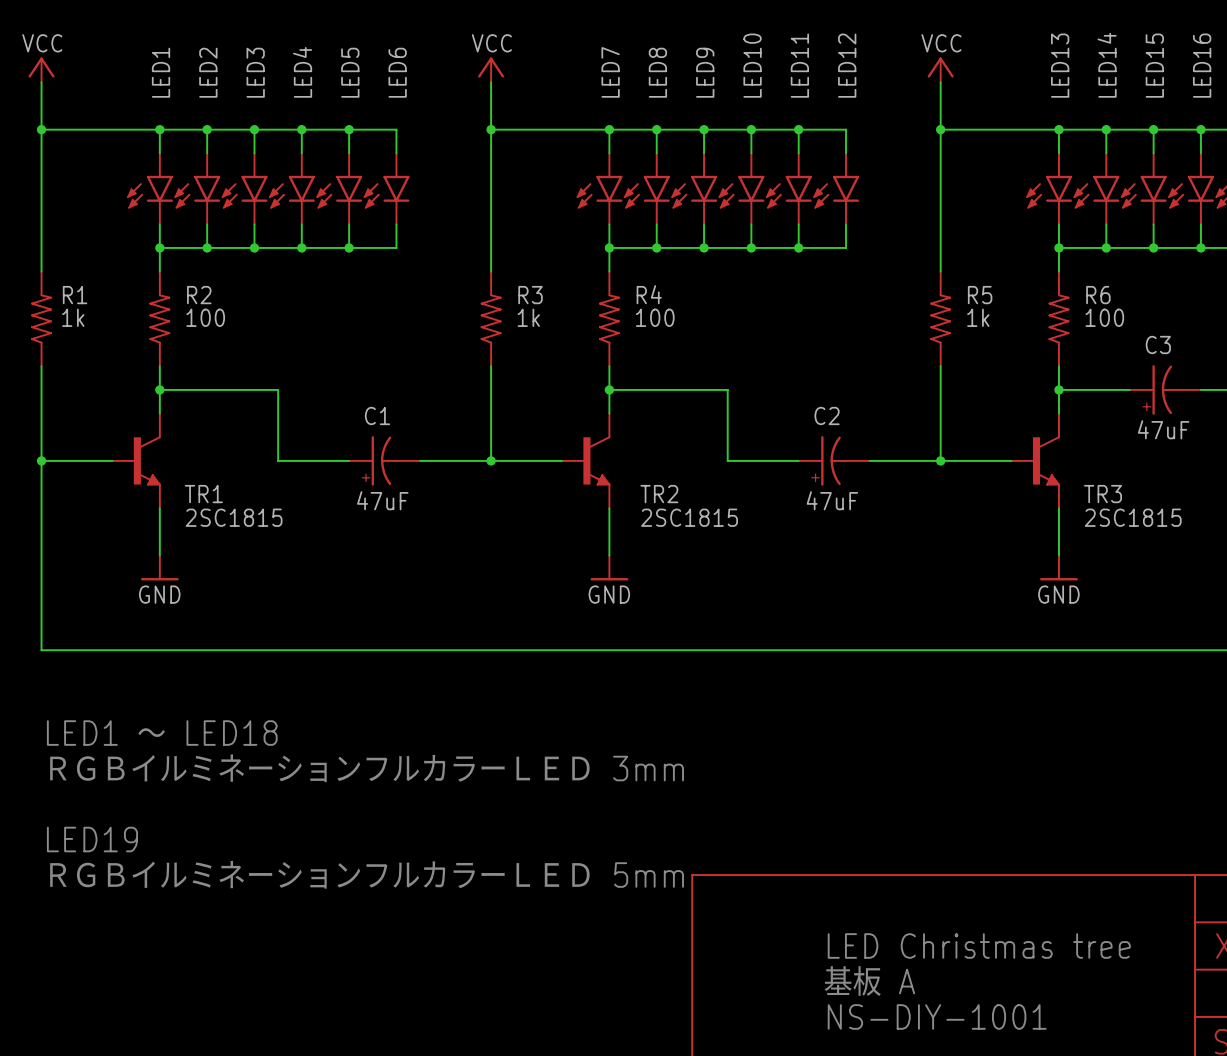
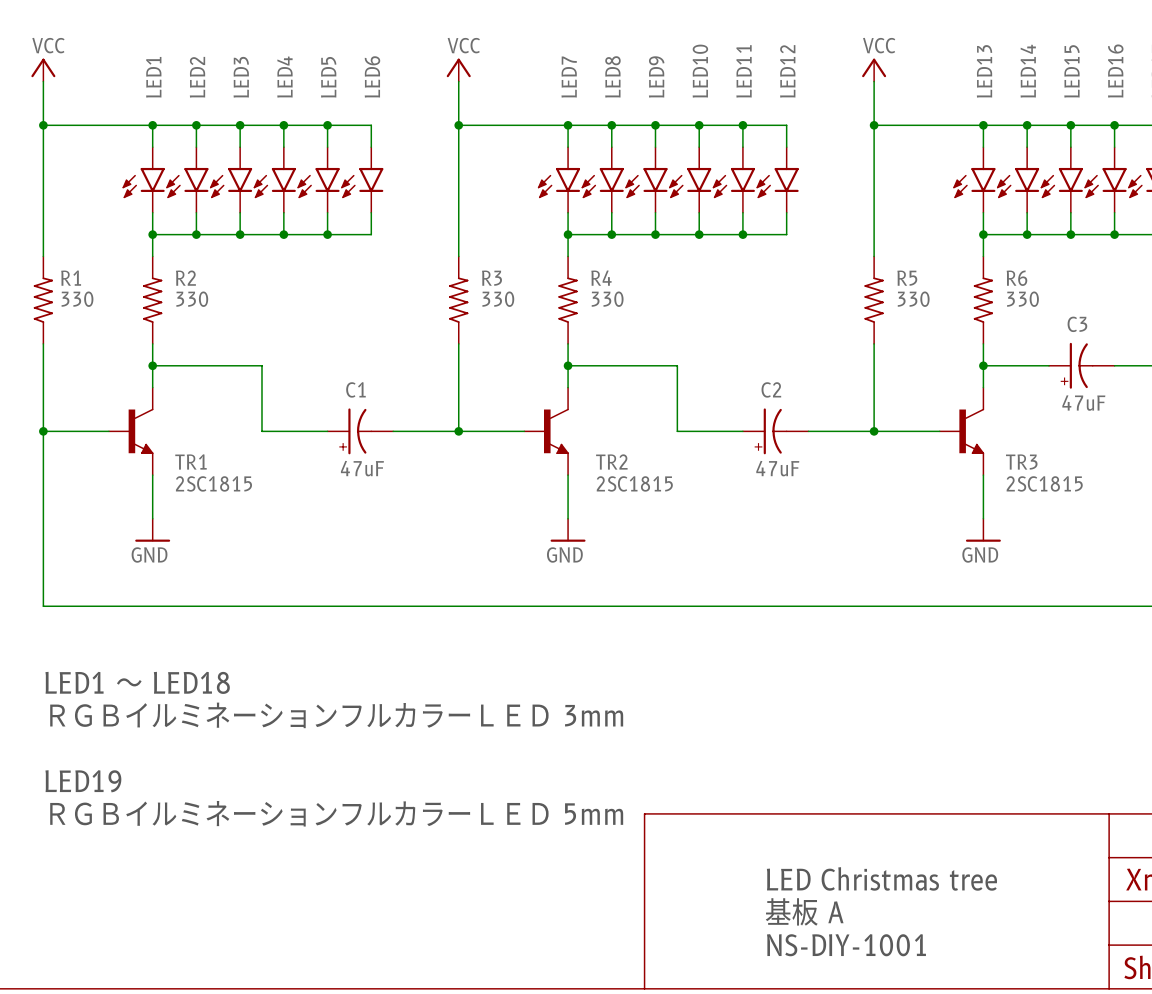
R1 value: 1k (73, 317) -> 330 (77, 299)
R2 value: 100 (205, 317) -> 330 (192, 299)
R3 value: 1k (528, 317) -> 330 (498, 299)
R4 value: 100 (655, 317) -> 330 (607, 299)
R5 value: 1k (978, 317) -> 330 (913, 299)
R6 value: 100 (1104, 317) -> 330 (1022, 299)

